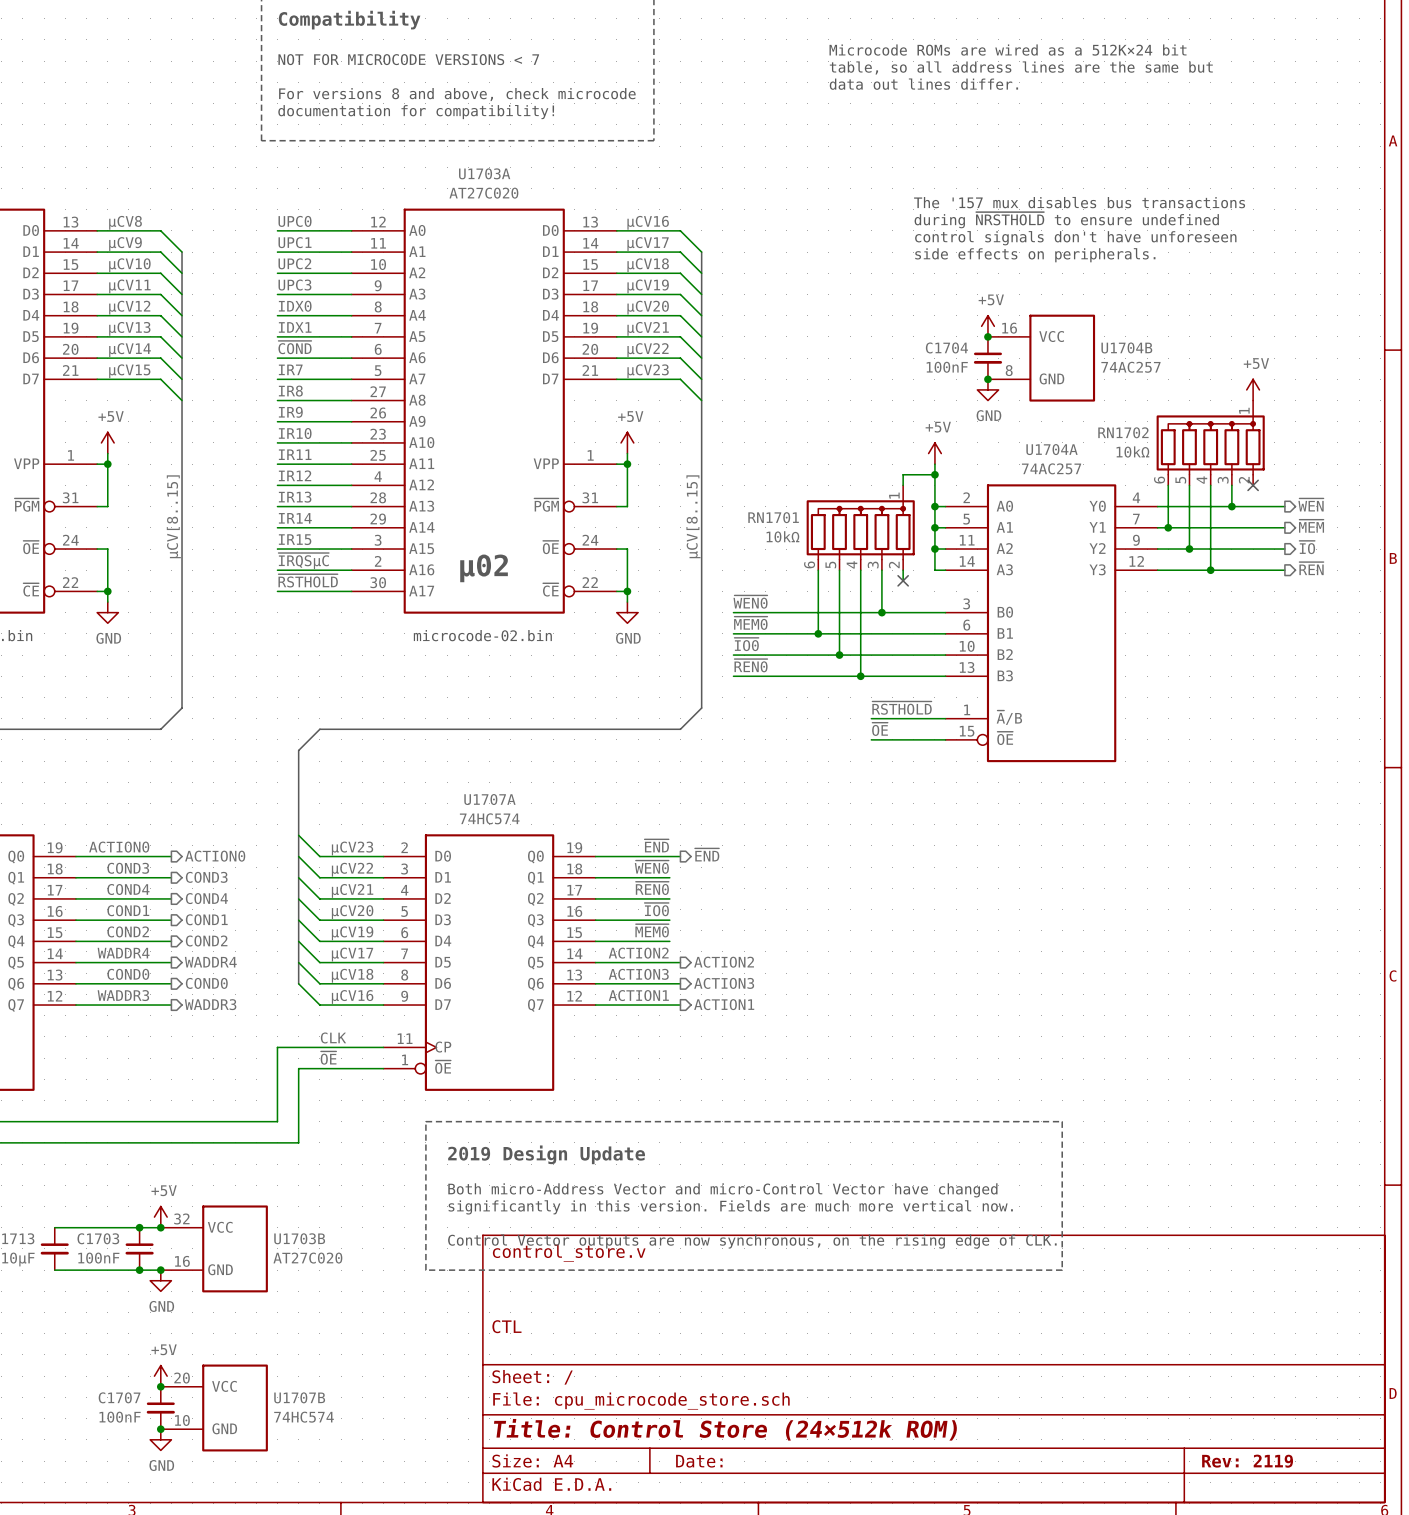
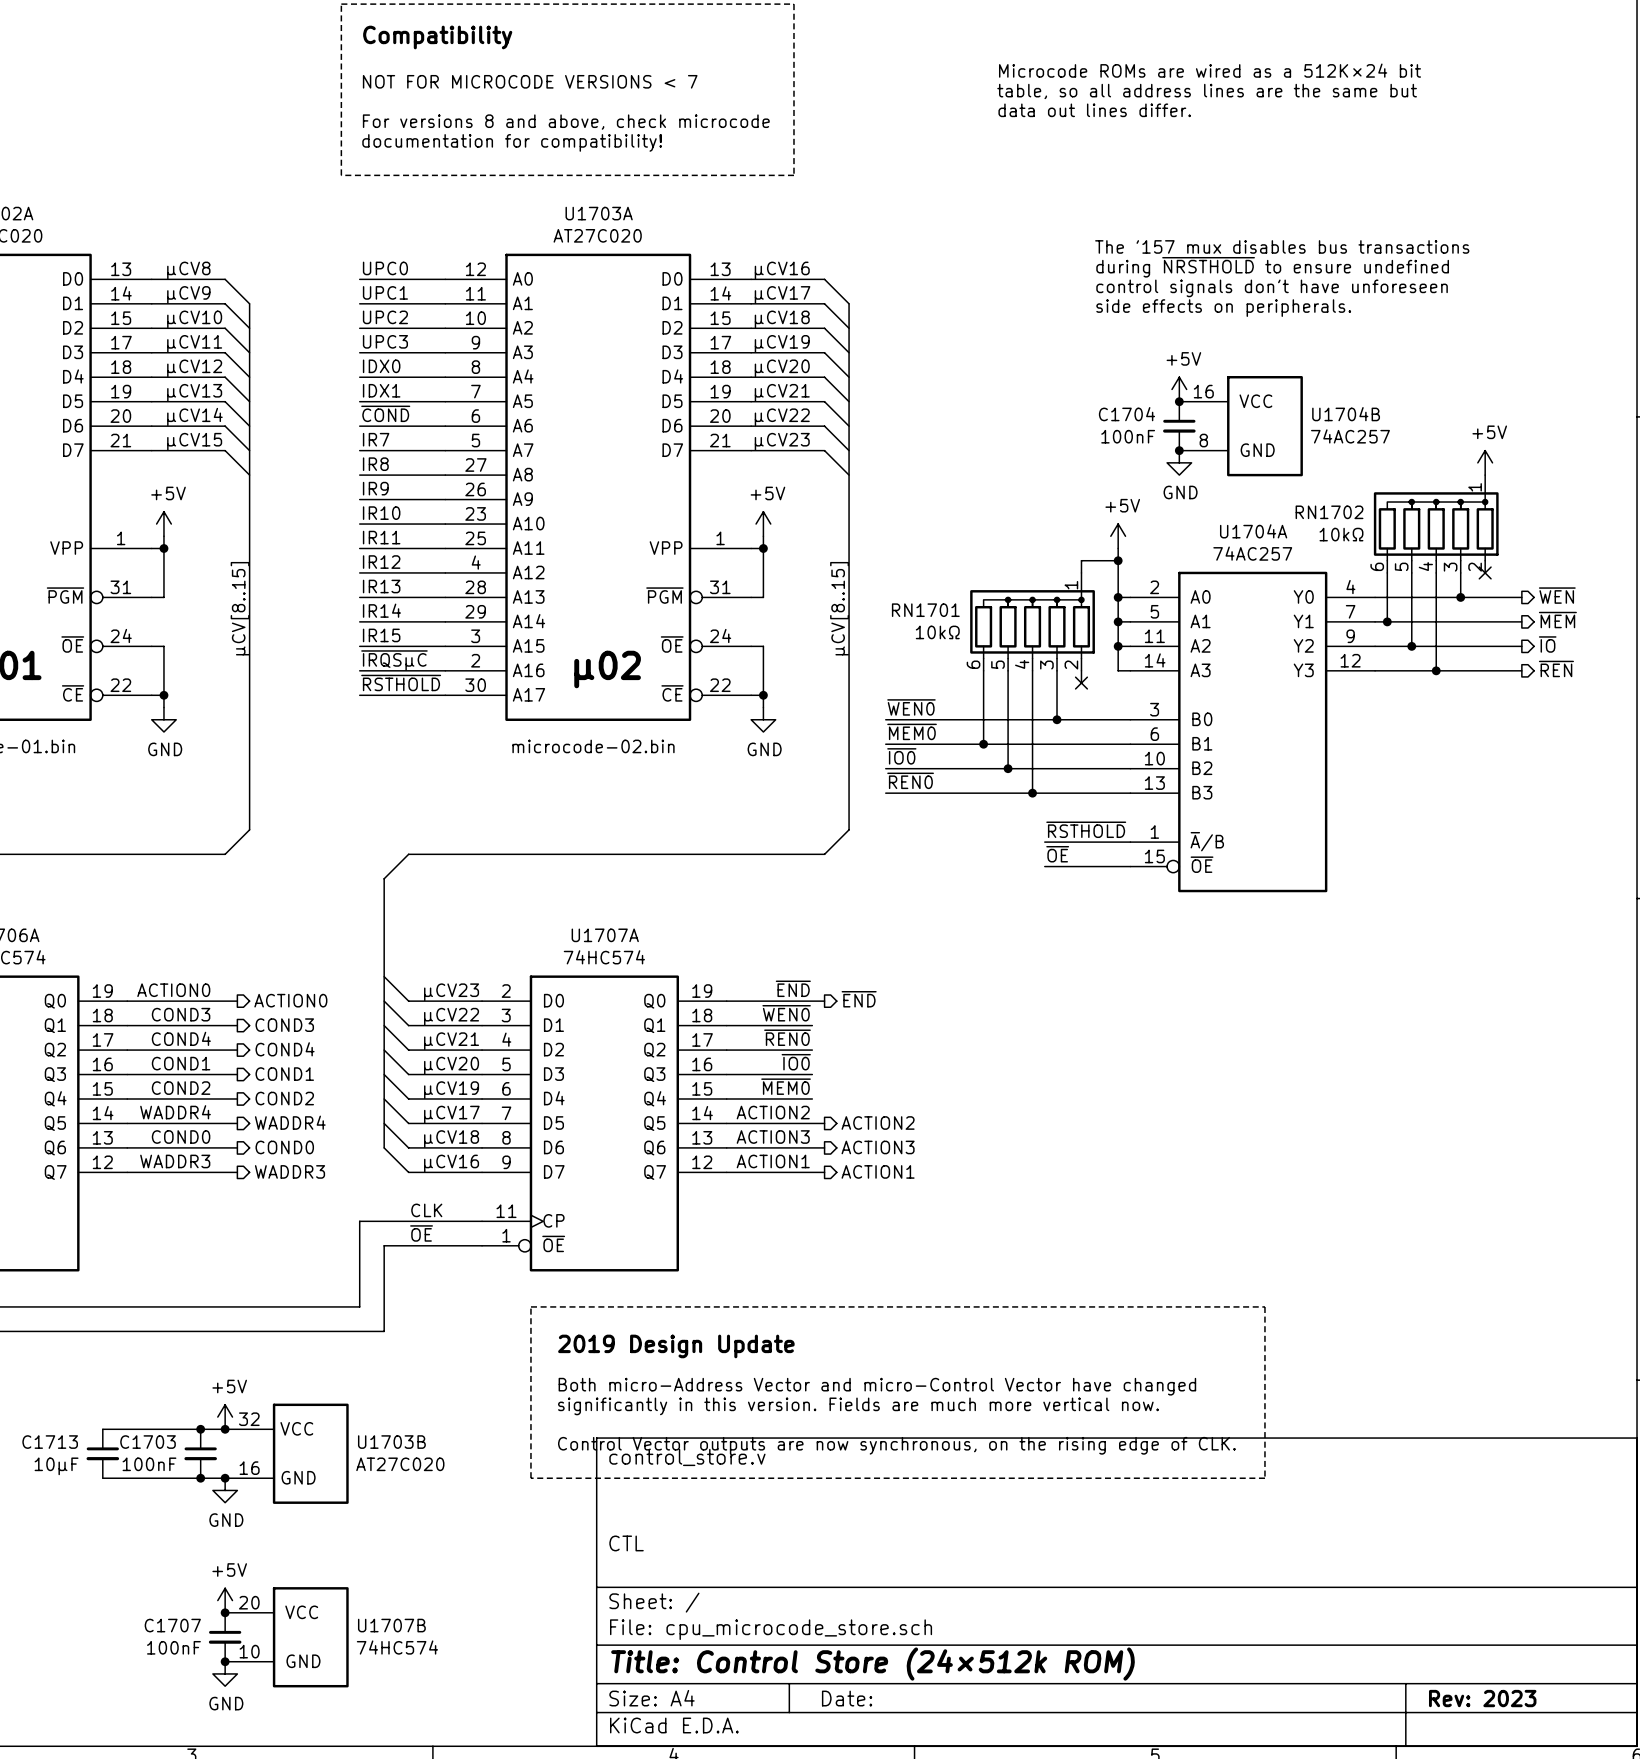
title block: Rev: 2119 (1247, 1461) -> Rev: 2023 (1482, 1698)

